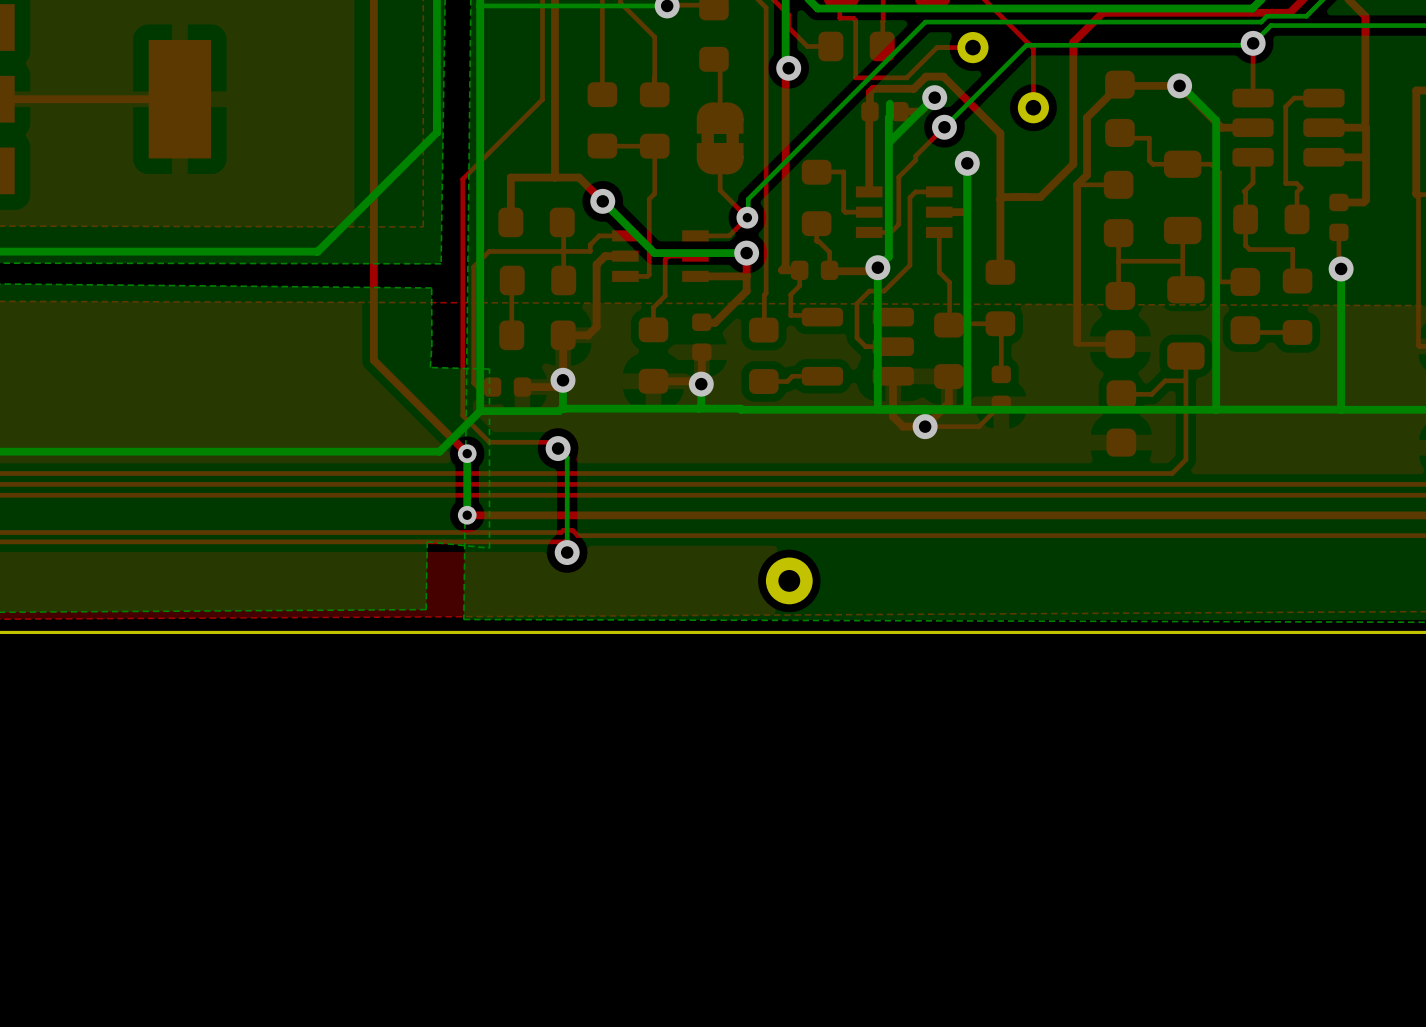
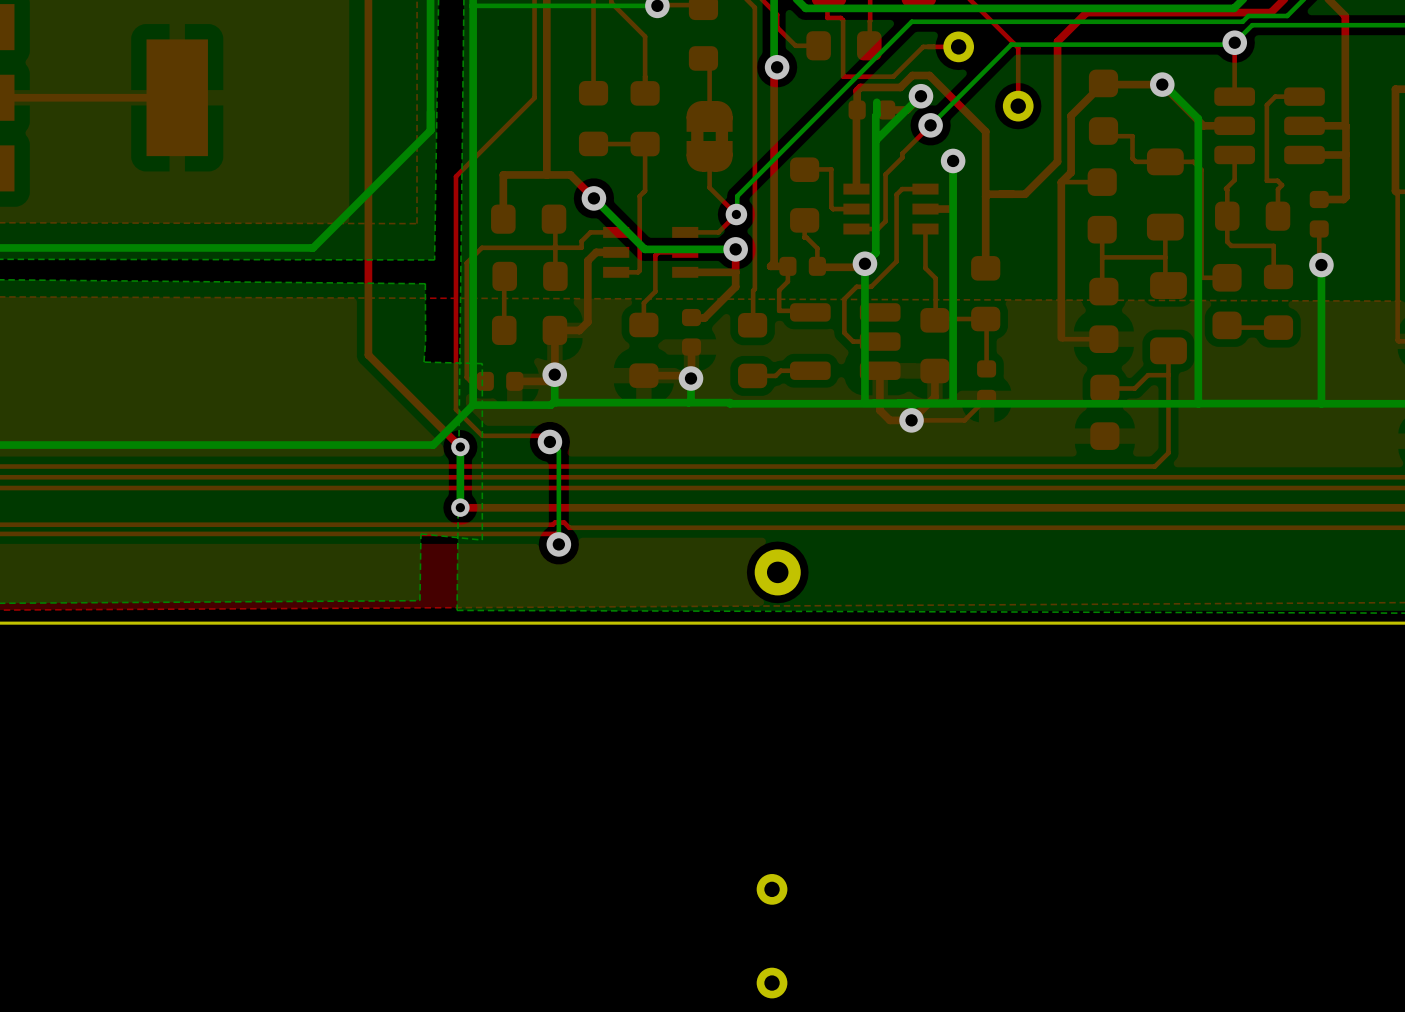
part: none -> (772, 889)
part: none -> (772, 983)

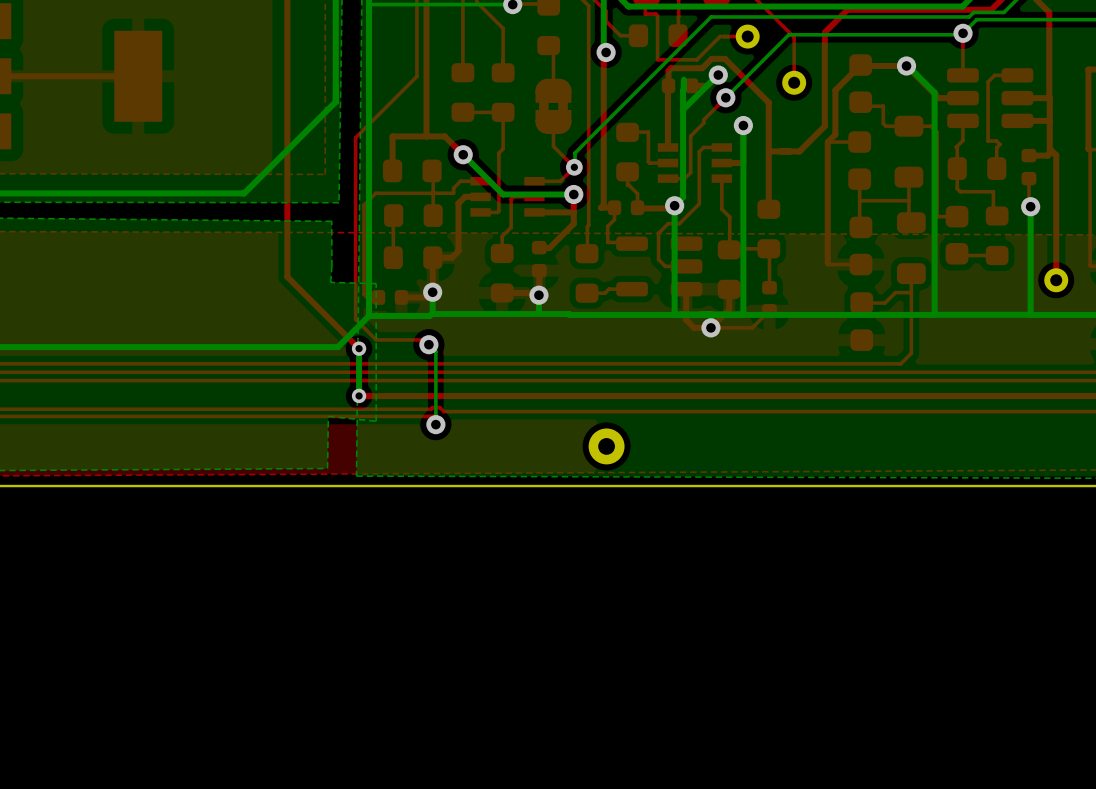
top track: none -> (1049, 148) (1056, 155) (1056, 280)
part: none -> (1056, 280)
part: (772, 889) -> none
part: (772, 983) -> none

